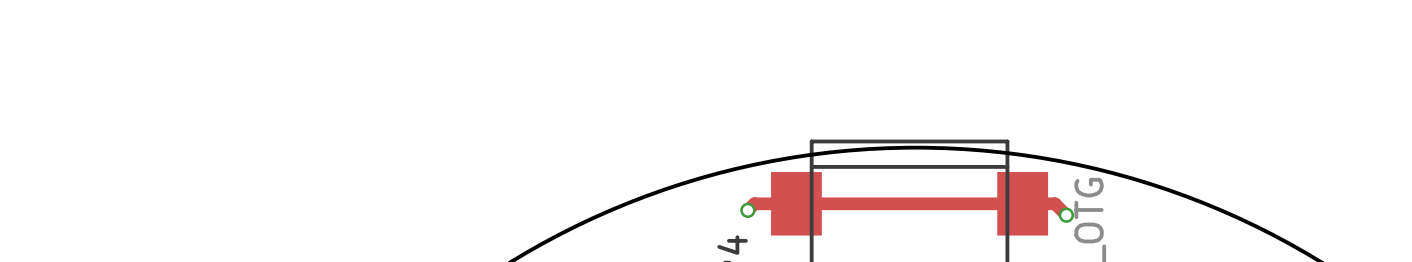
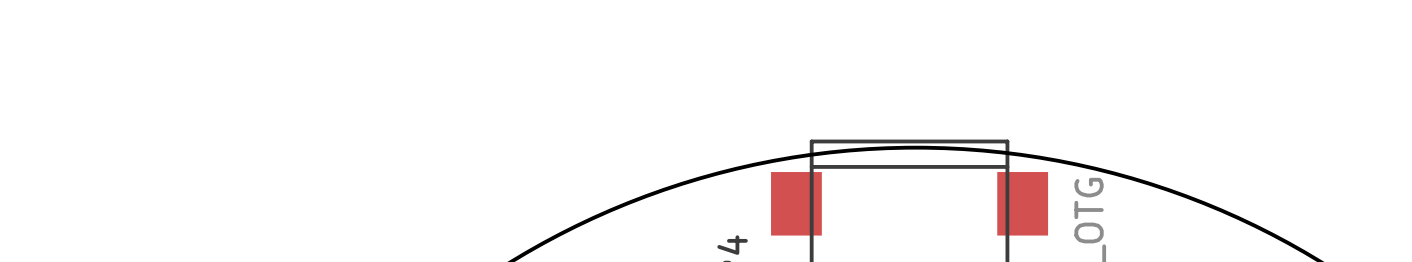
top track: (747, 210) (754, 203) (1054, 203) (1066, 215) -> none
via: (747, 210) -> none
via: (1066, 215) -> none

